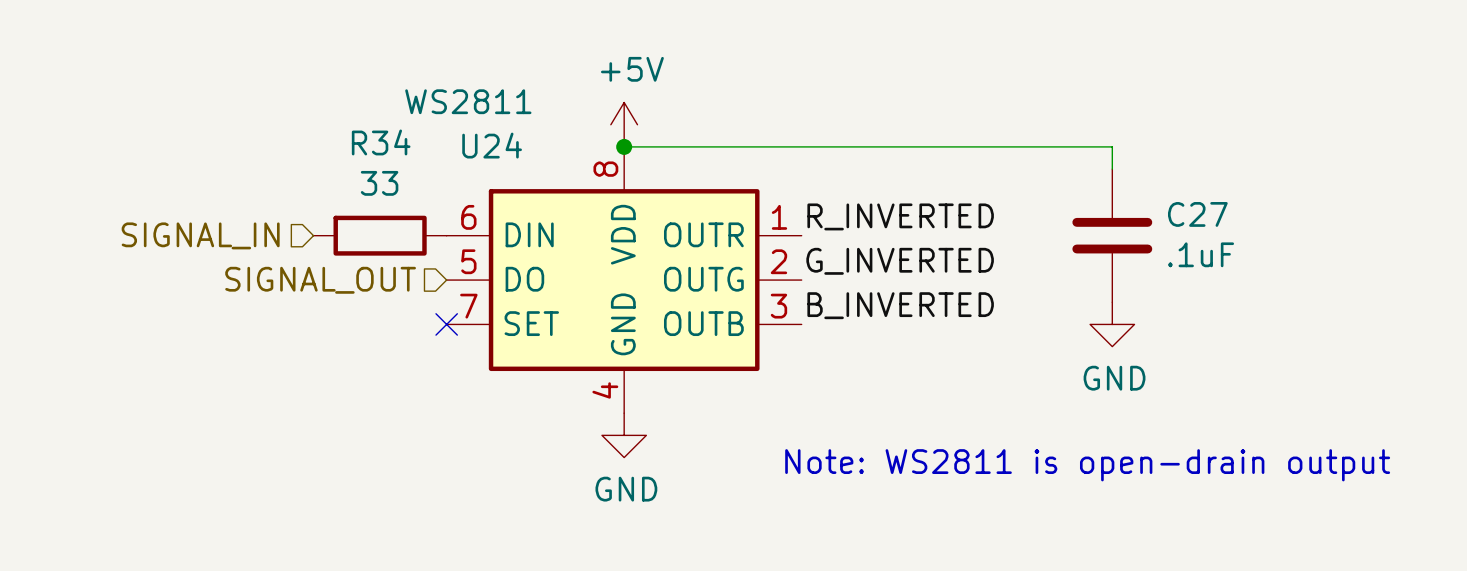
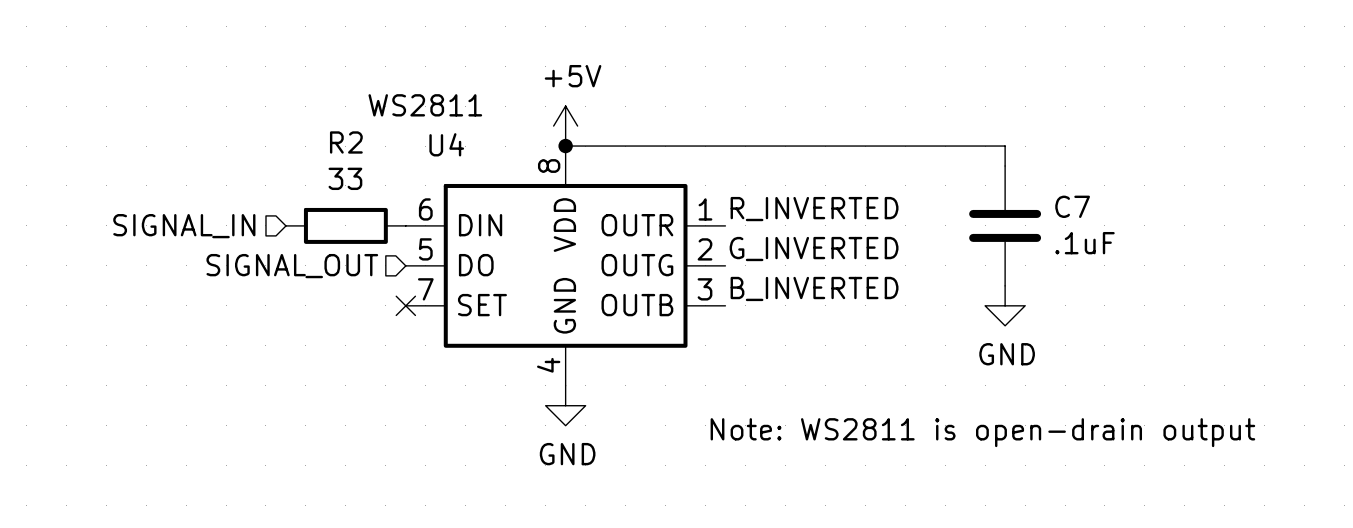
R34 name: R34 (381, 142) -> R2 (346, 142)
U24 name: U24 (492, 145) -> U4 (446, 144)
C27 name: C27 (1197, 214) -> C7 (1072, 206)

